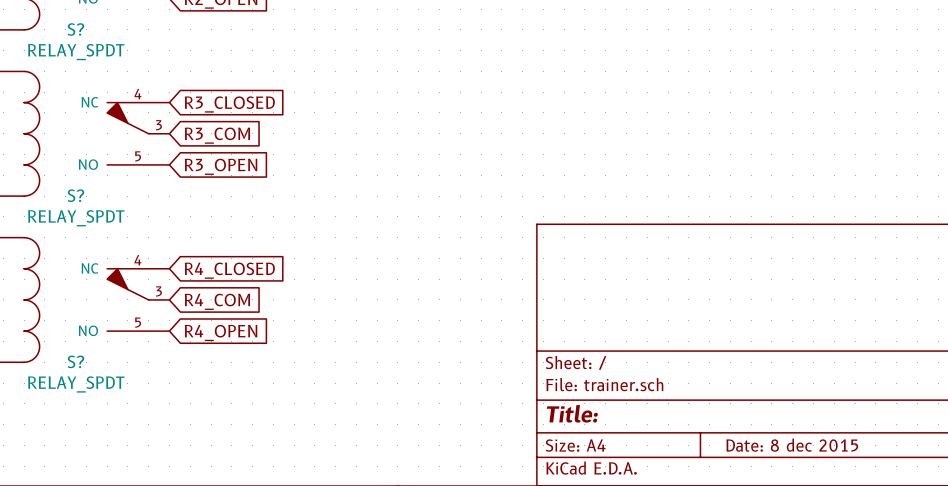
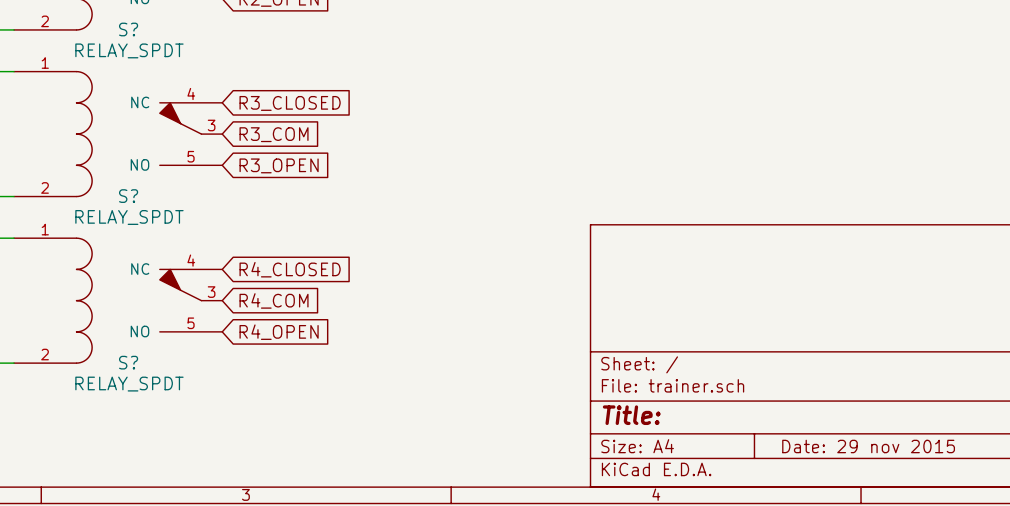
title block: Date: 8 dec 2015 (792, 445) -> Date: 29 nov 2015 (868, 446)

